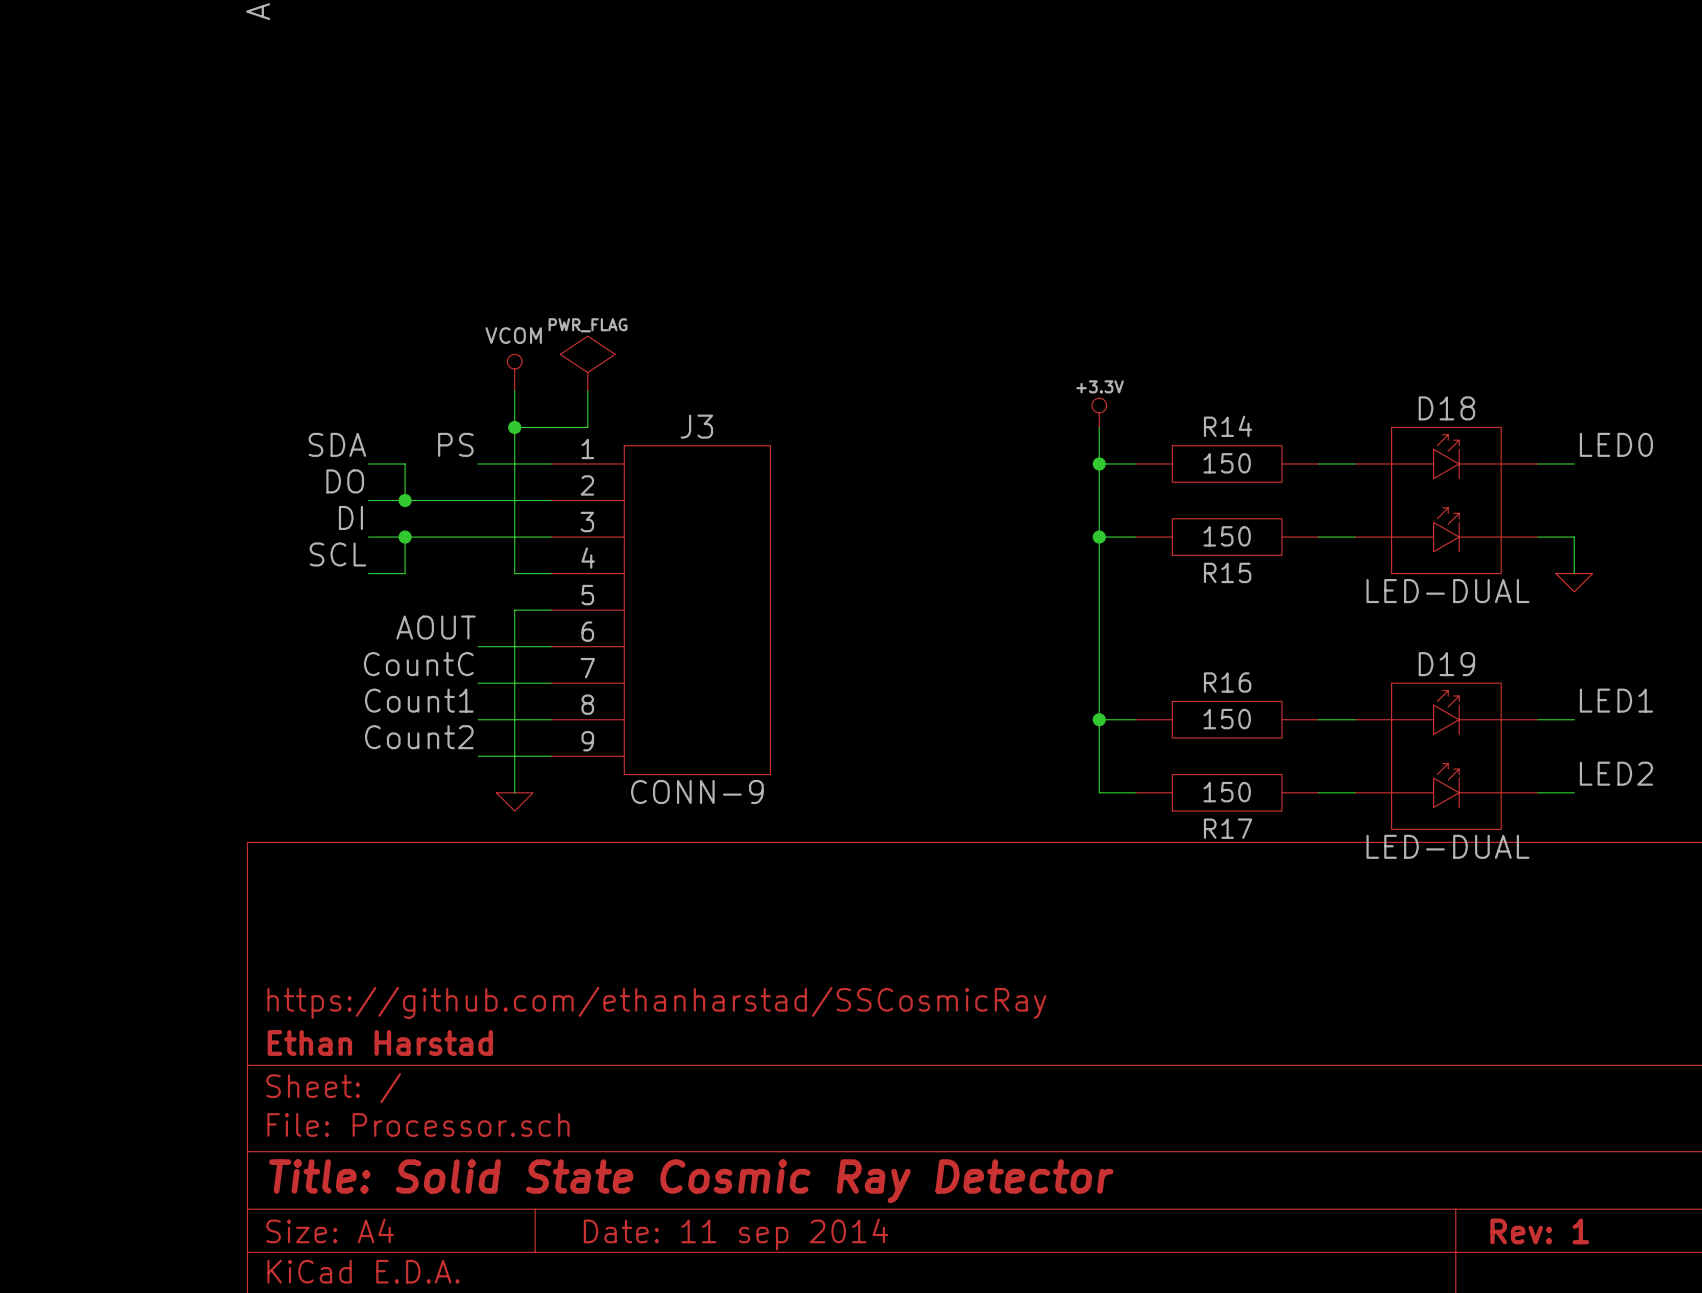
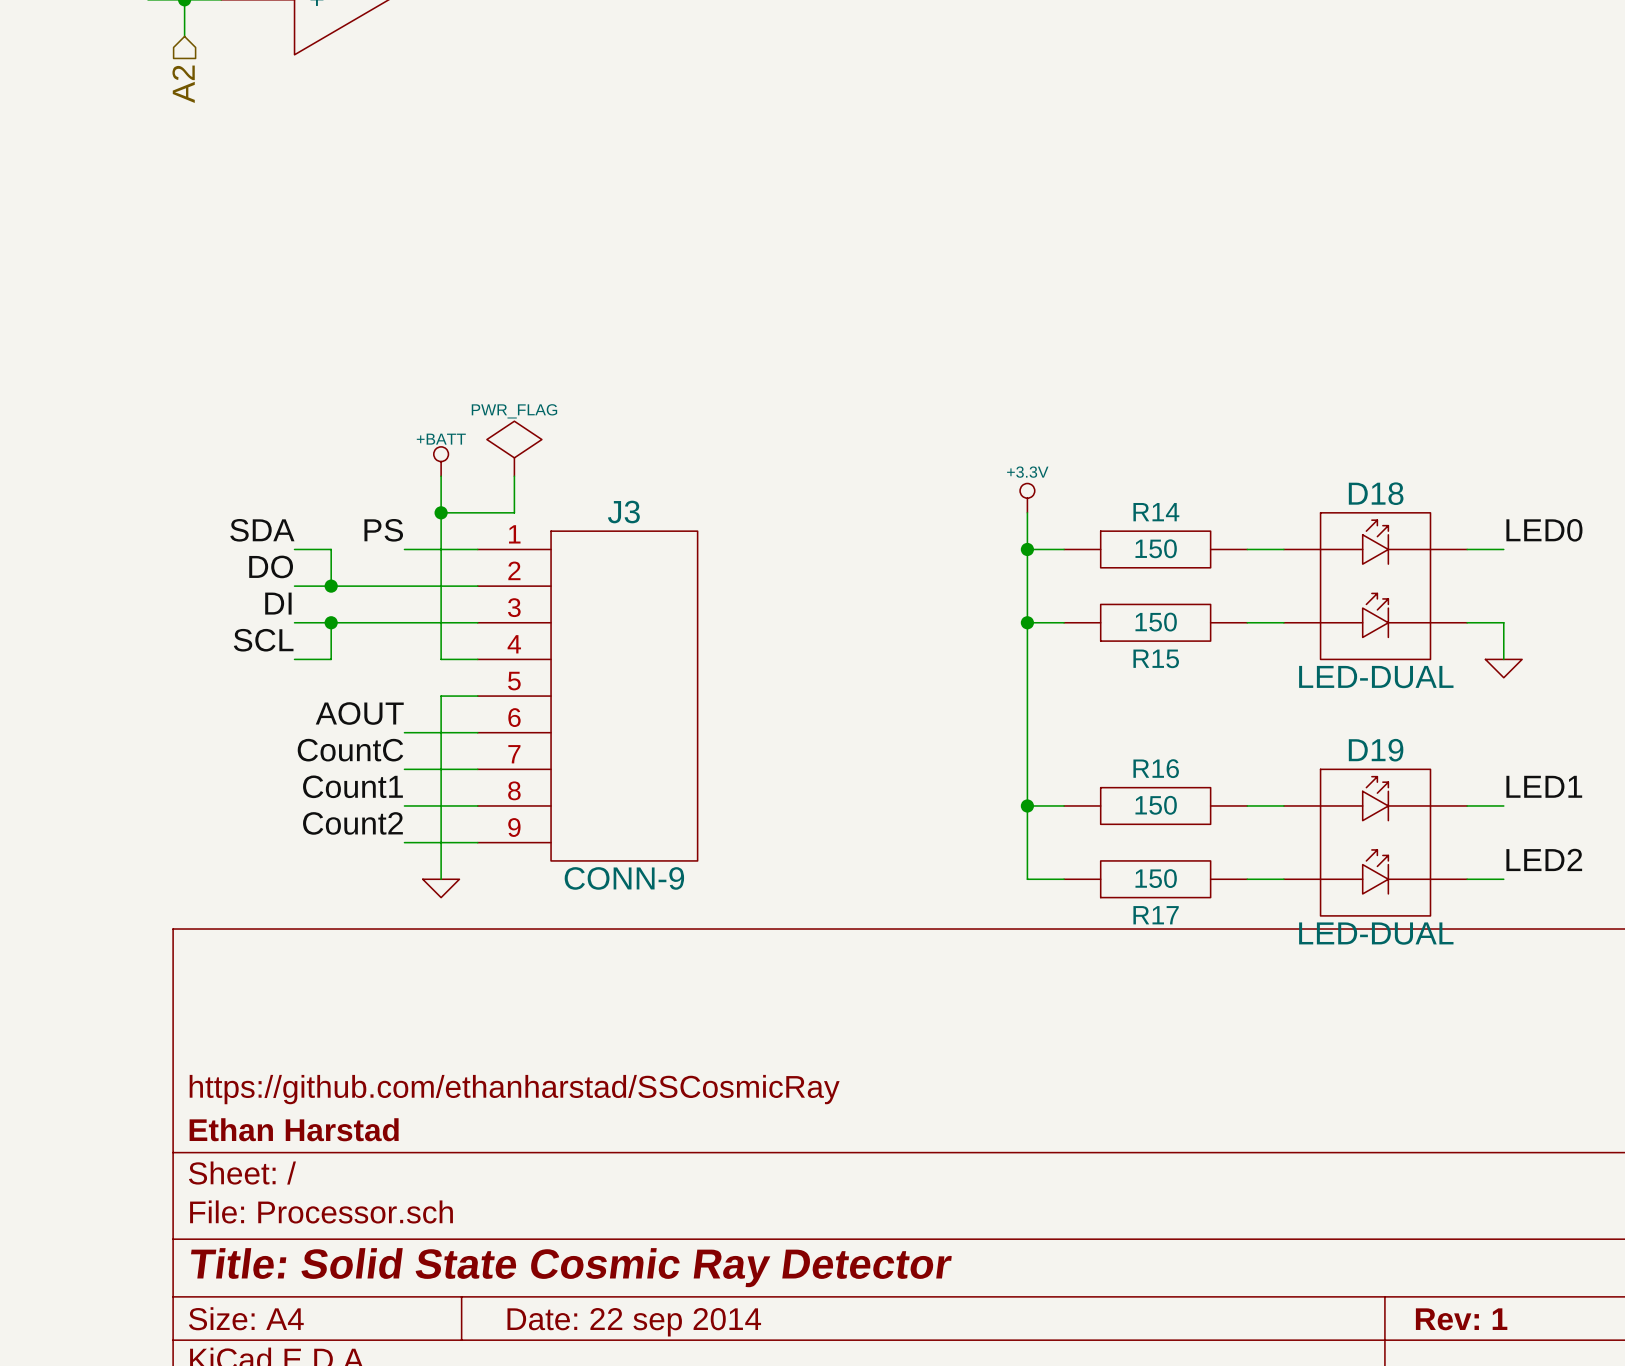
power symbol: VCOM (514, 372) -> +BATT (441, 461)
title block: Date: 11 sep 2014 (735, 1234) -> Date: 22 sep 2014 (634, 1322)

